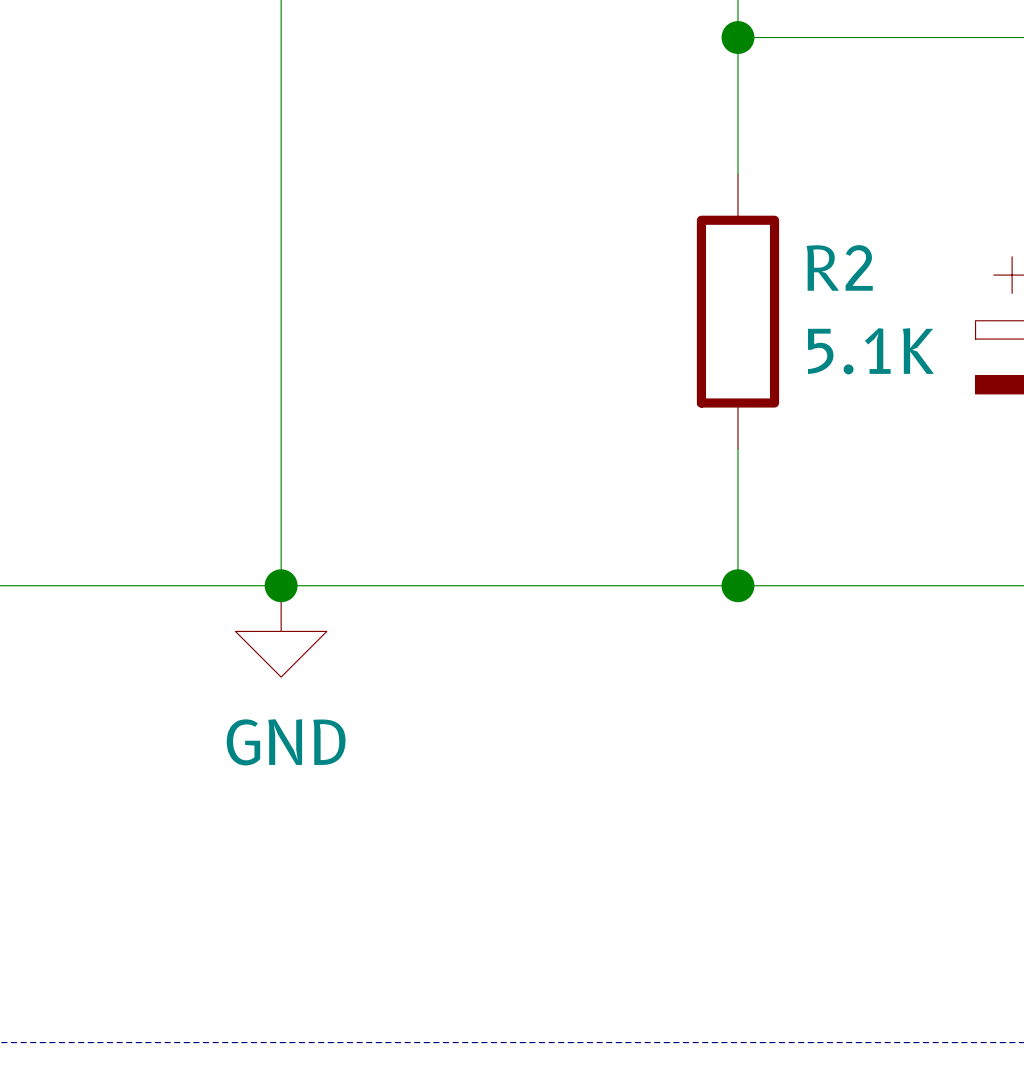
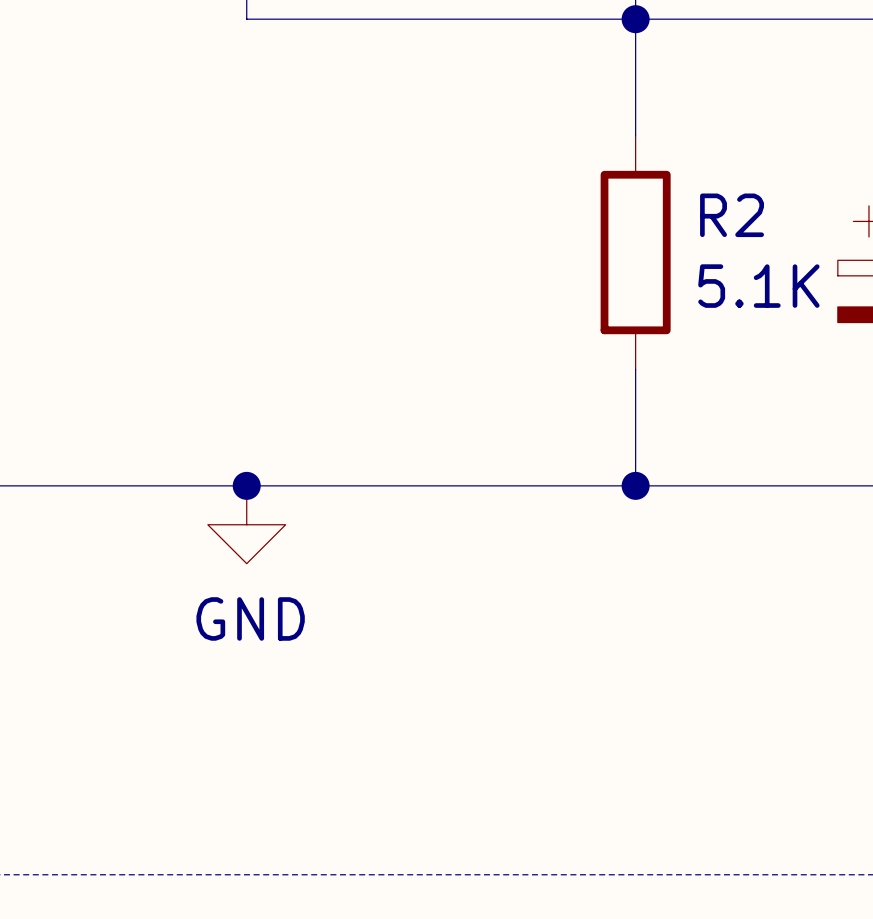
wire: (281, 37) (281, 585) -> (246, 19) (635, 19)

